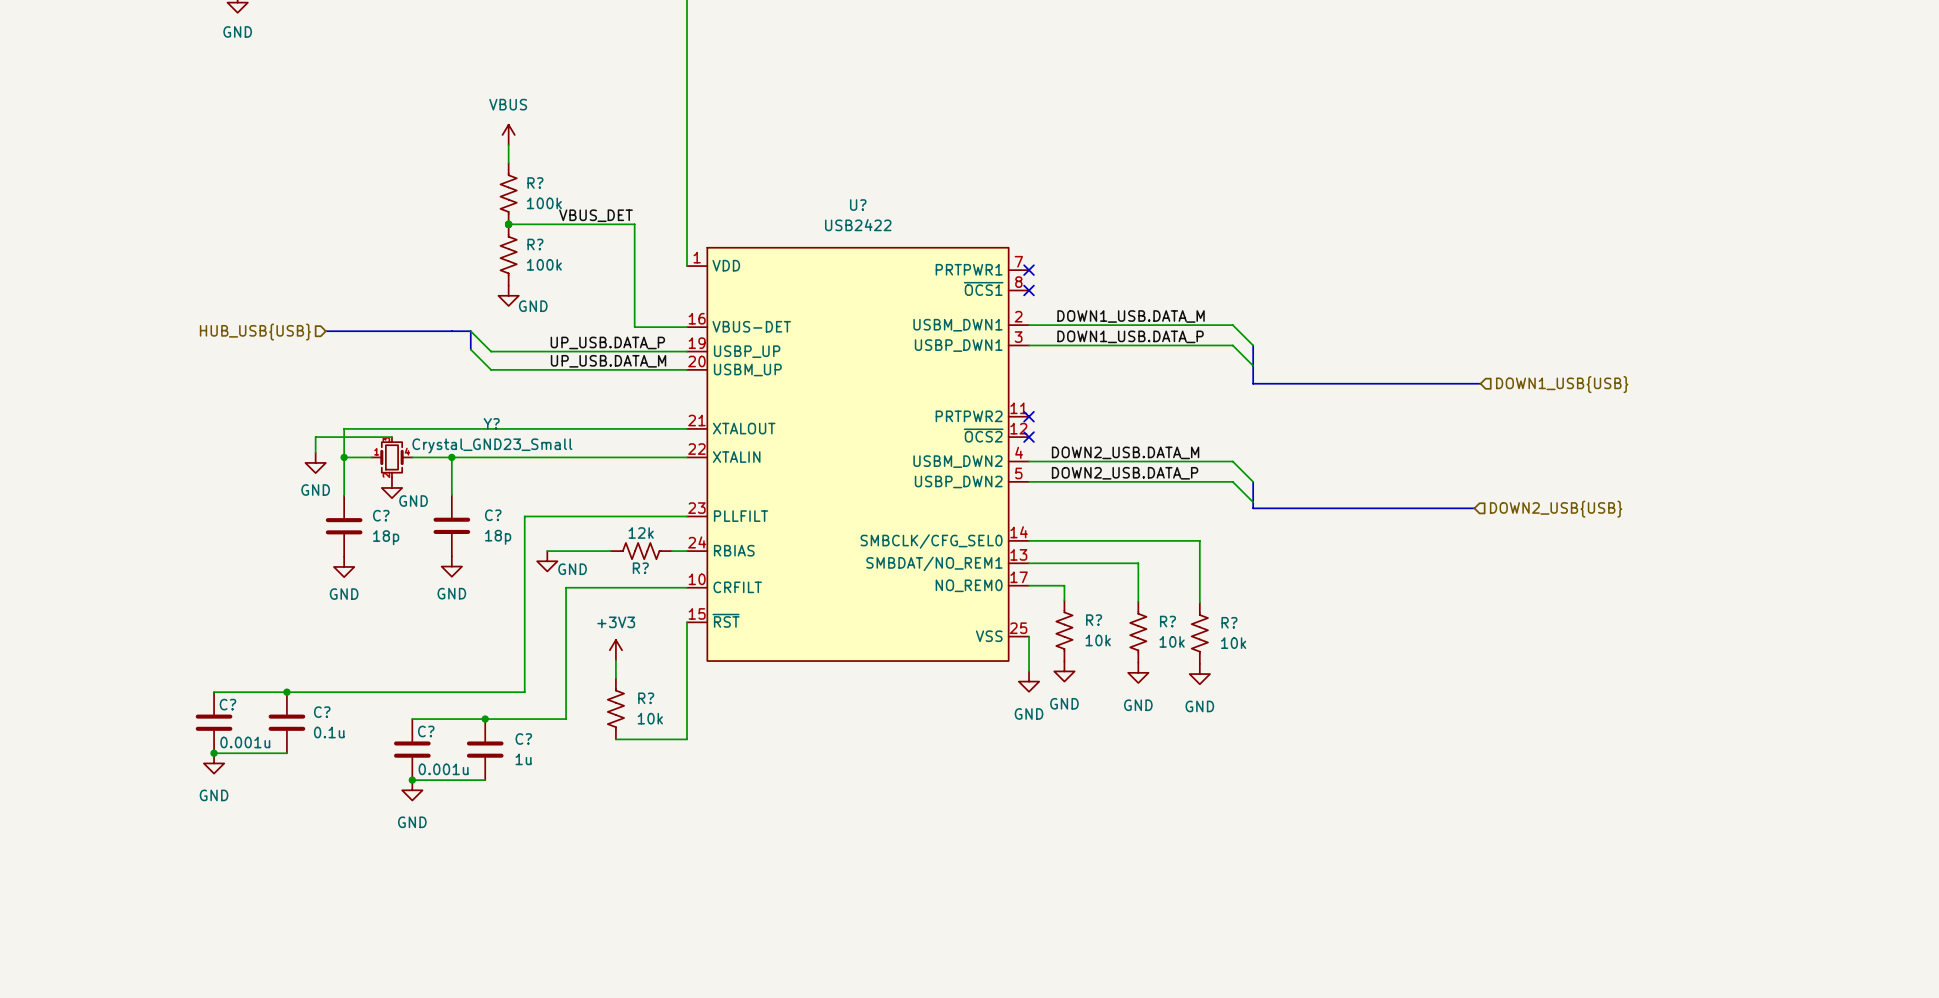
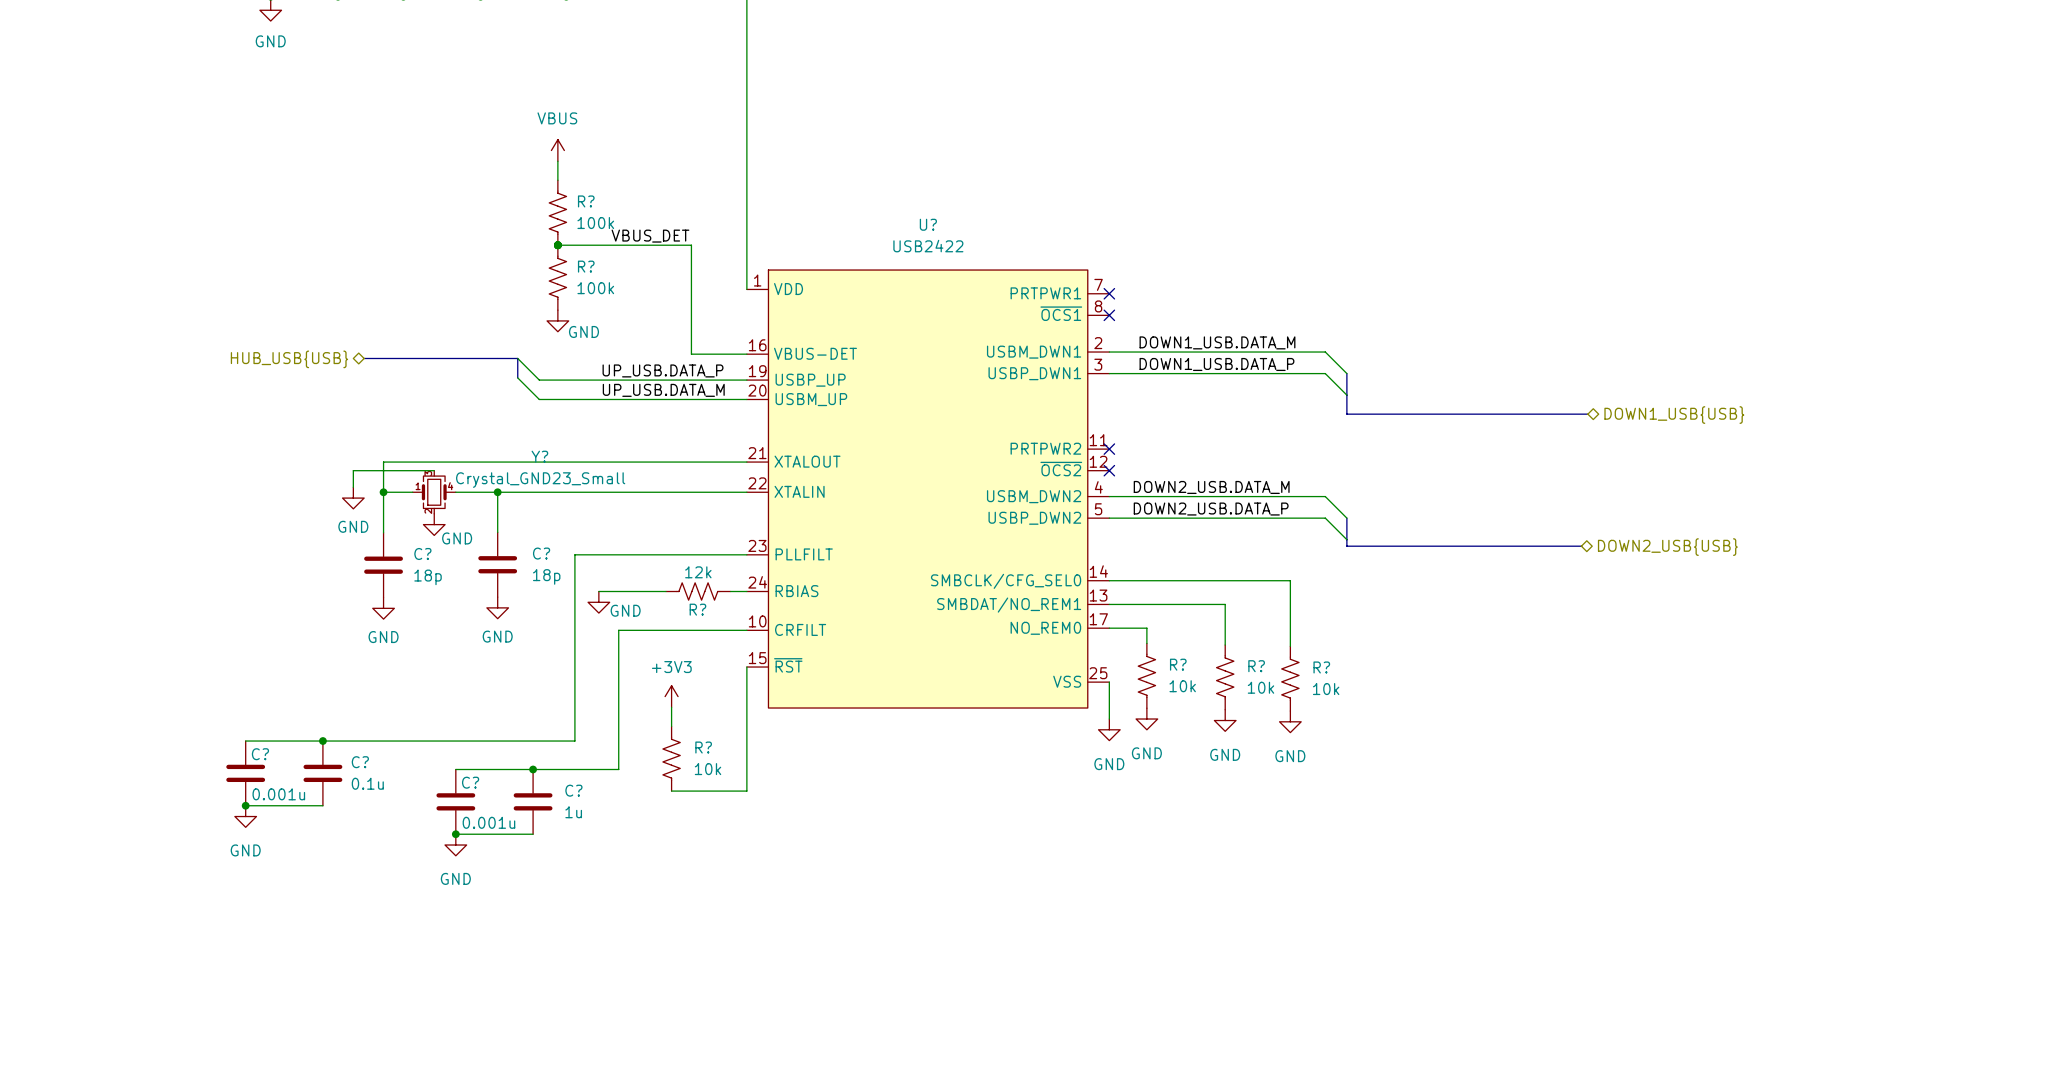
hierarchical label shape: input (255, 332) -> bidirectional (289, 359)
hierarchical label shape: input (1562, 384) -> bidirectional (1674, 415)
hierarchical label shape: input (1556, 509) -> bidirectional (1667, 547)

